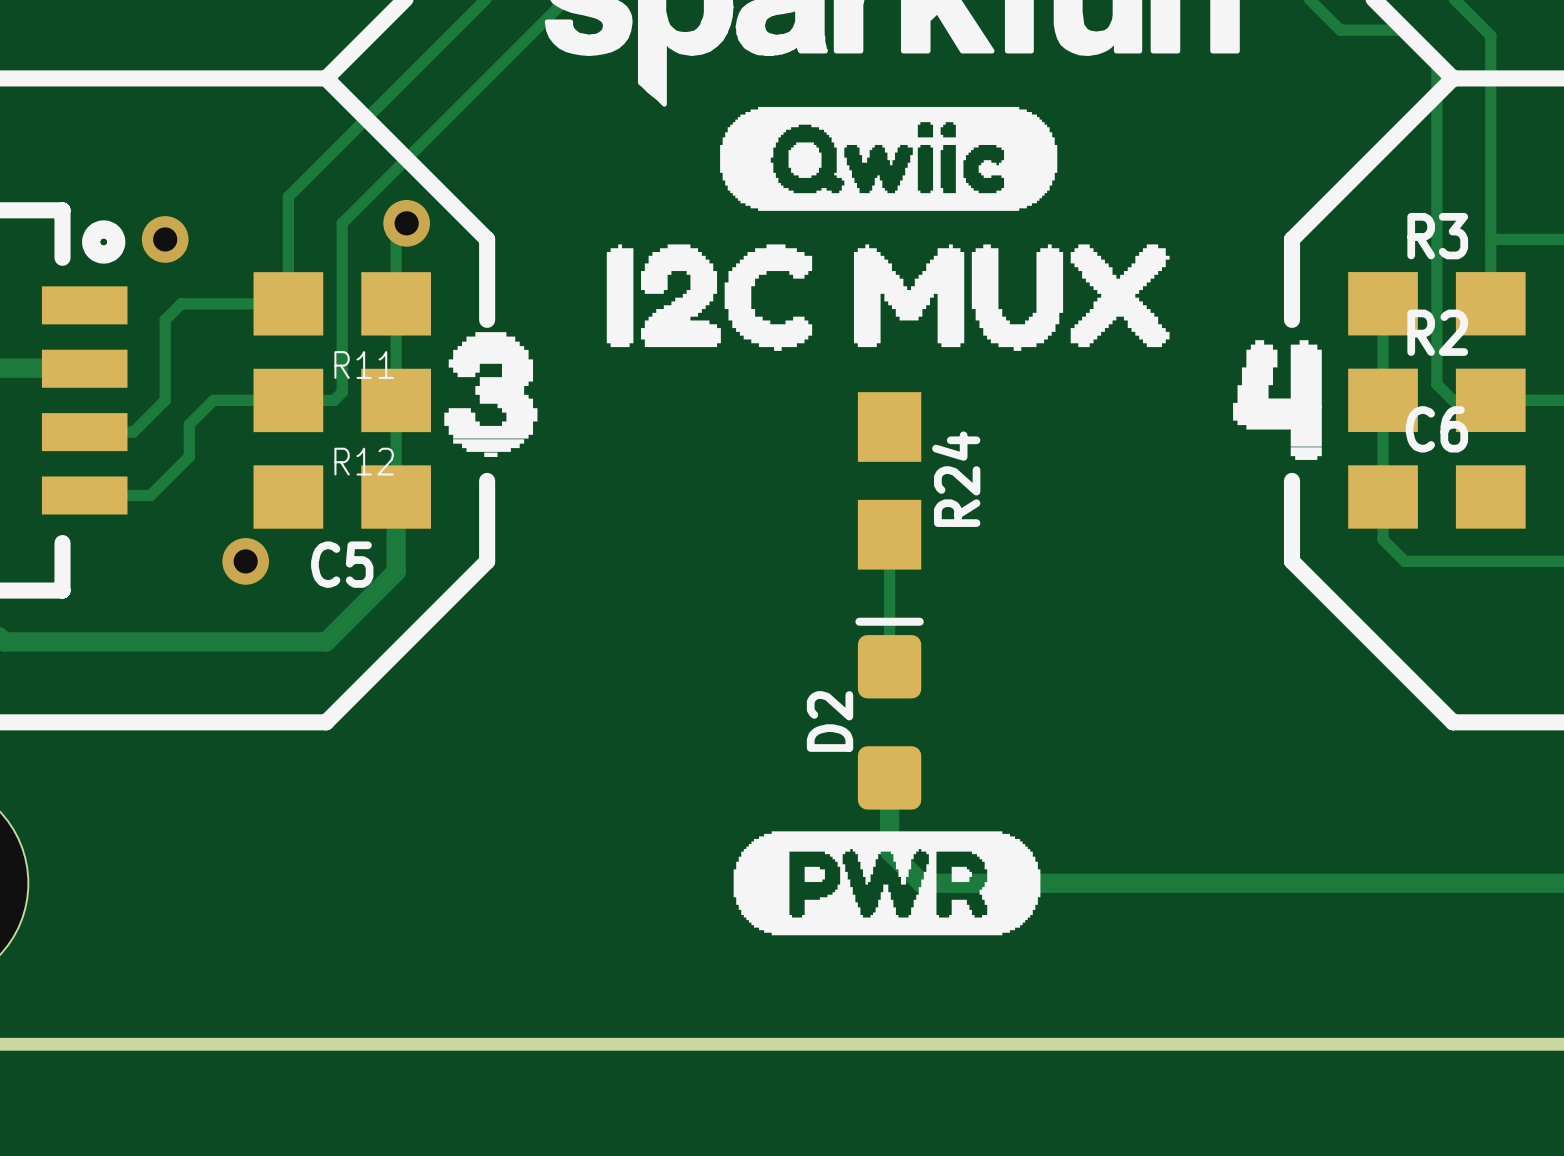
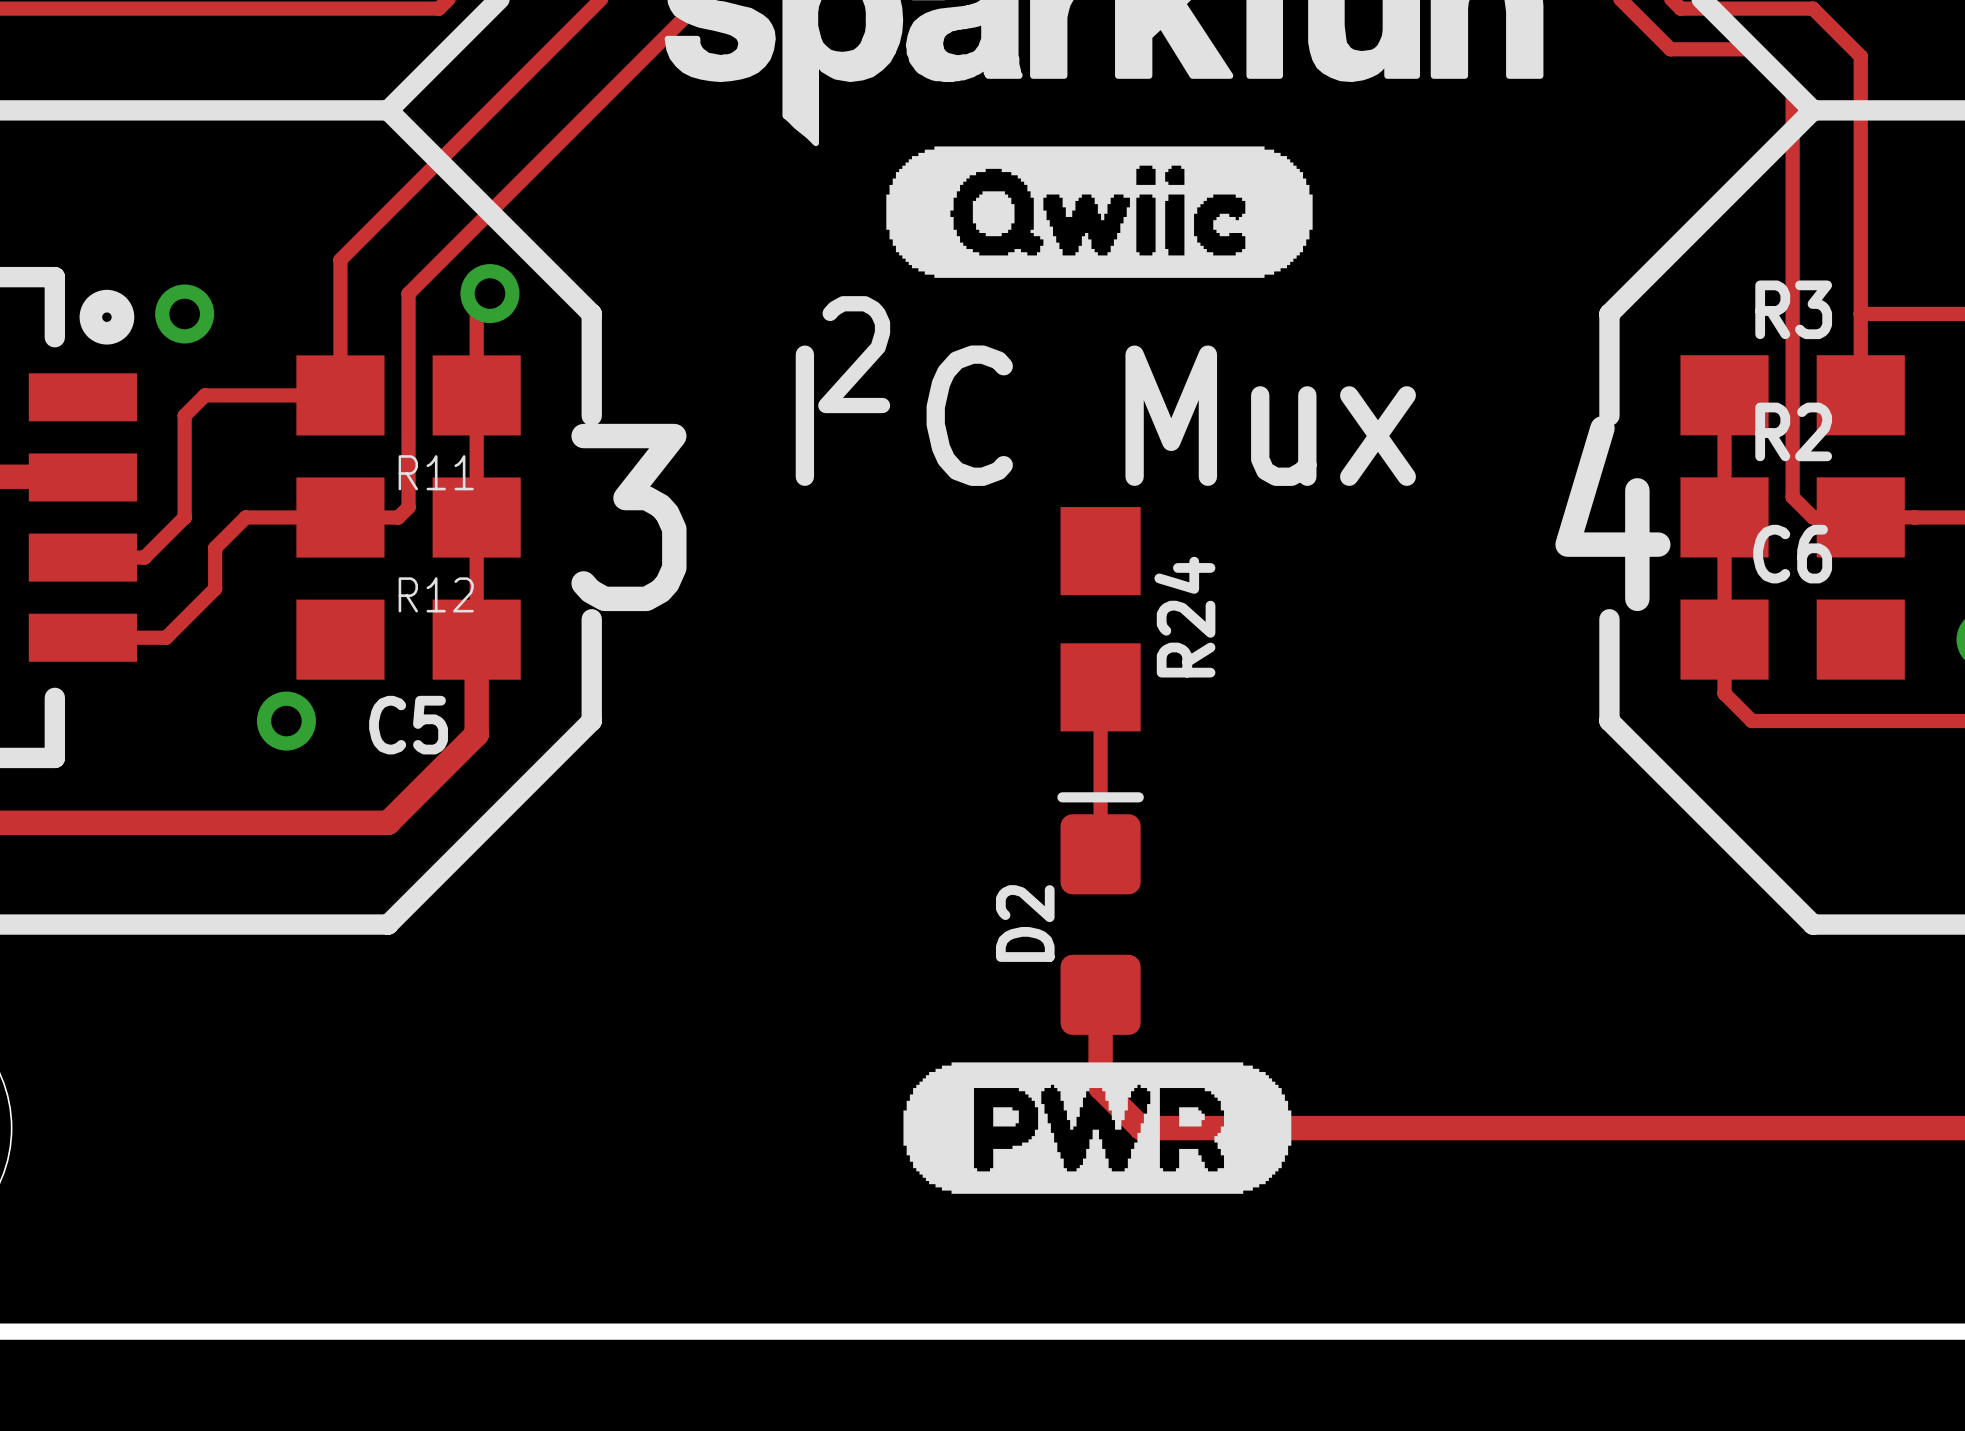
drawing: [444, 244, 1322, 460] -> none
text: none -> 2 (854, 354)
text: none -> I C Mux (1105, 415)
text: none -> 4 (1612, 513)
text: none -> 3 (628, 517)

